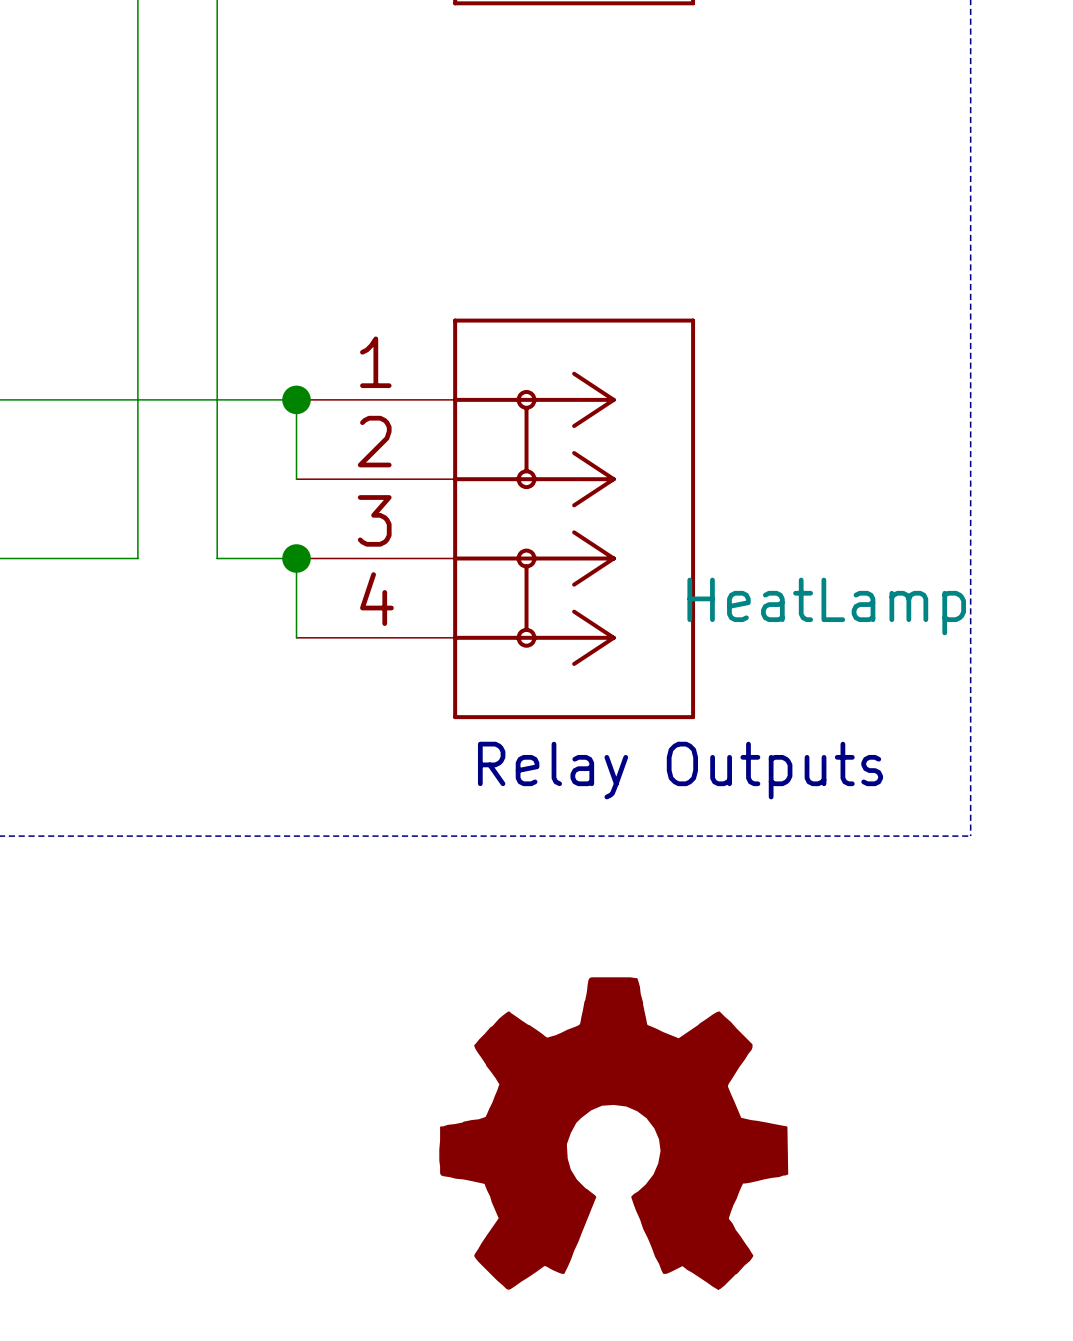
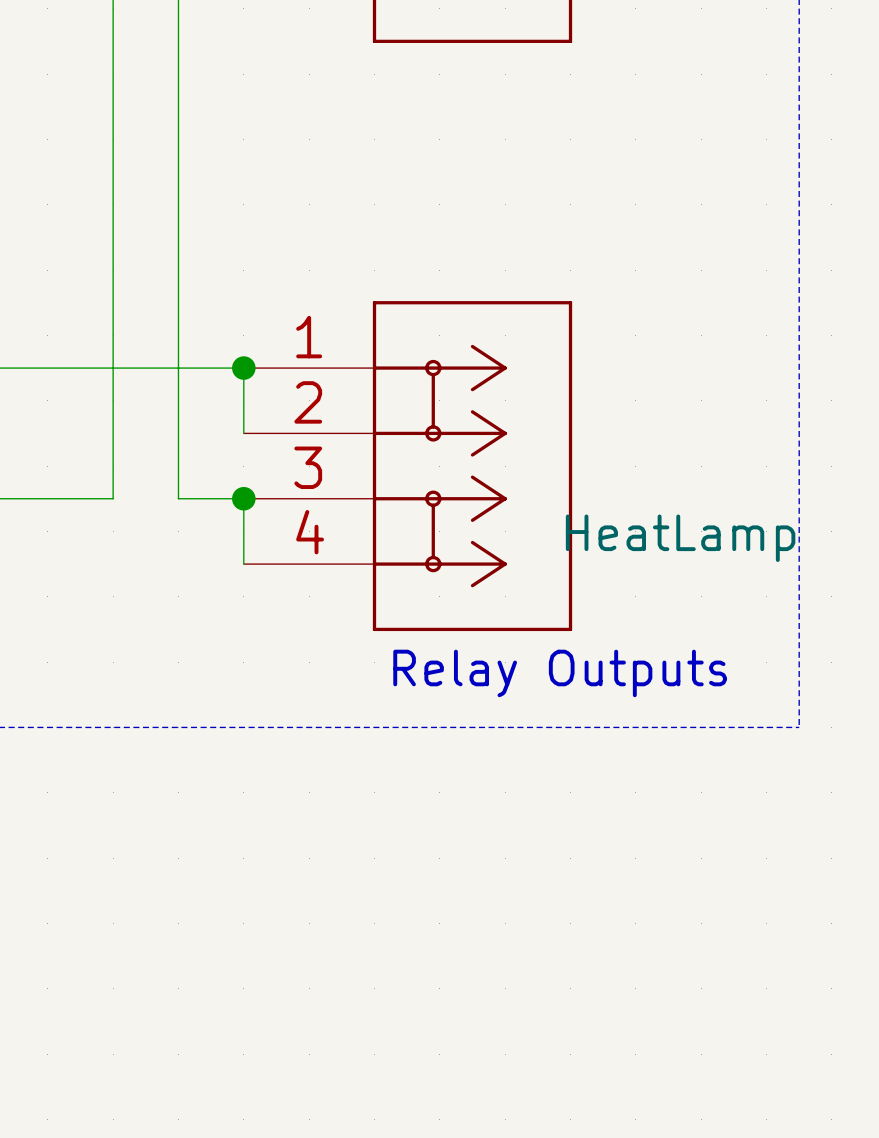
part: (613, 1133) -> none

